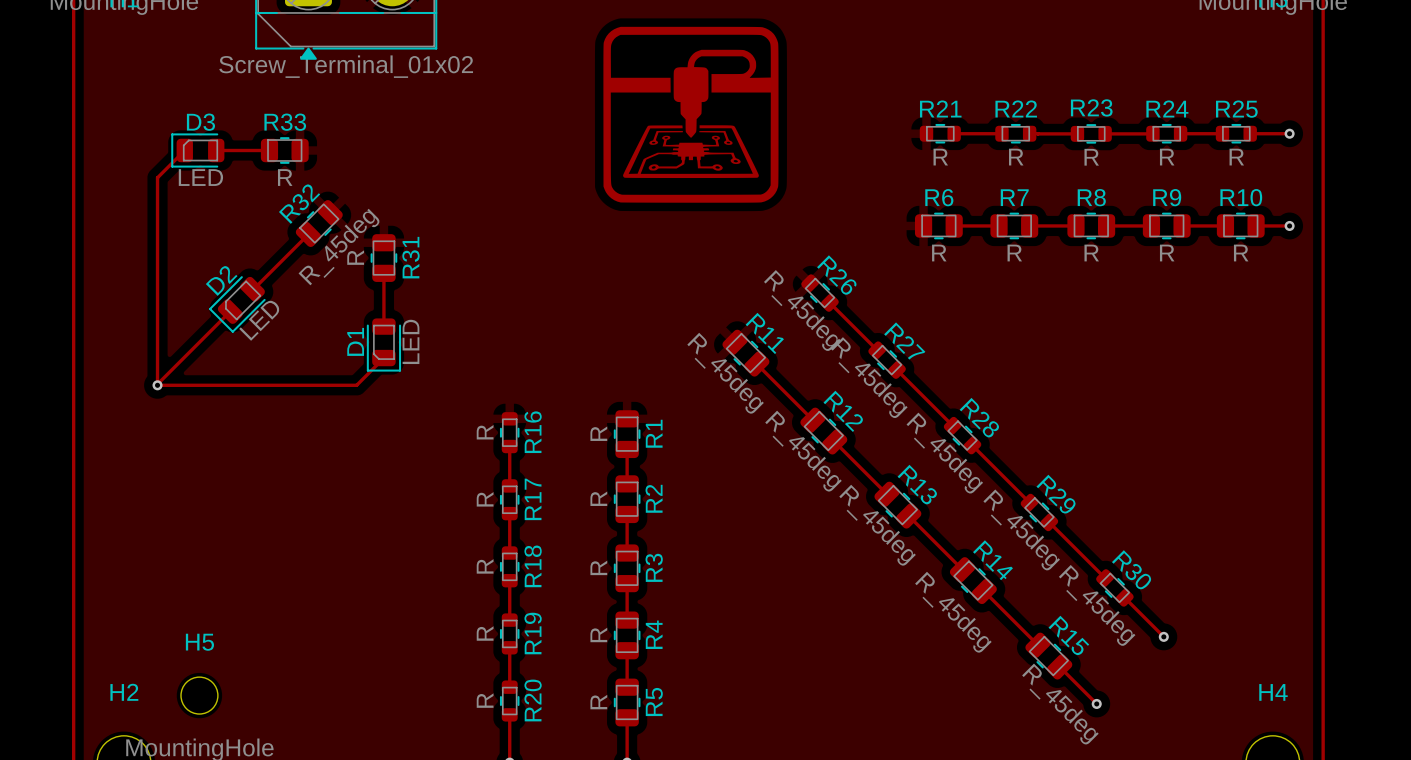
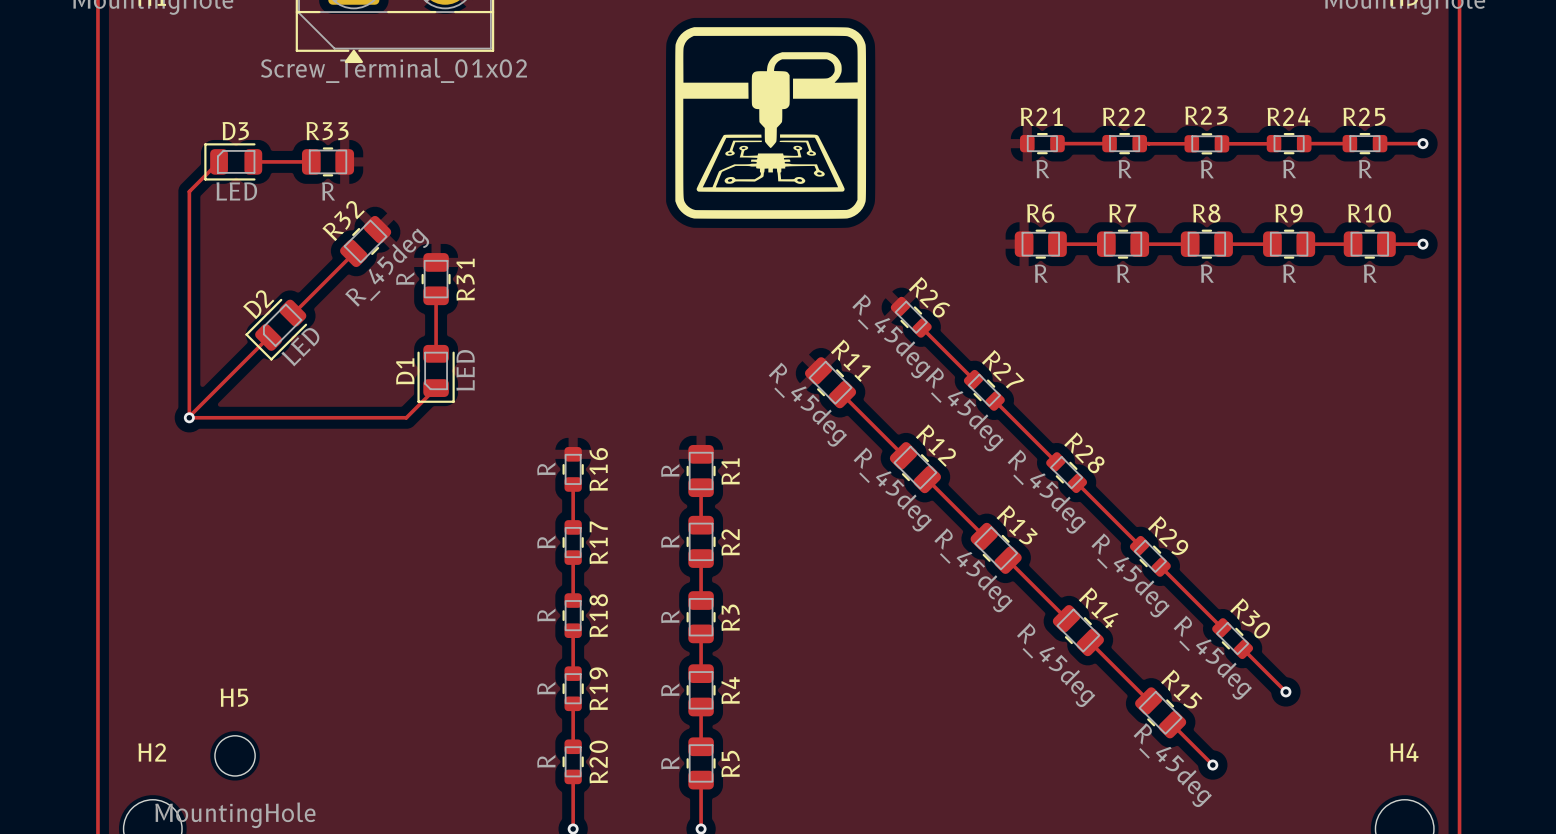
drawing shape: [603, 26, 779, 203] -> [675, 27, 867, 219]

